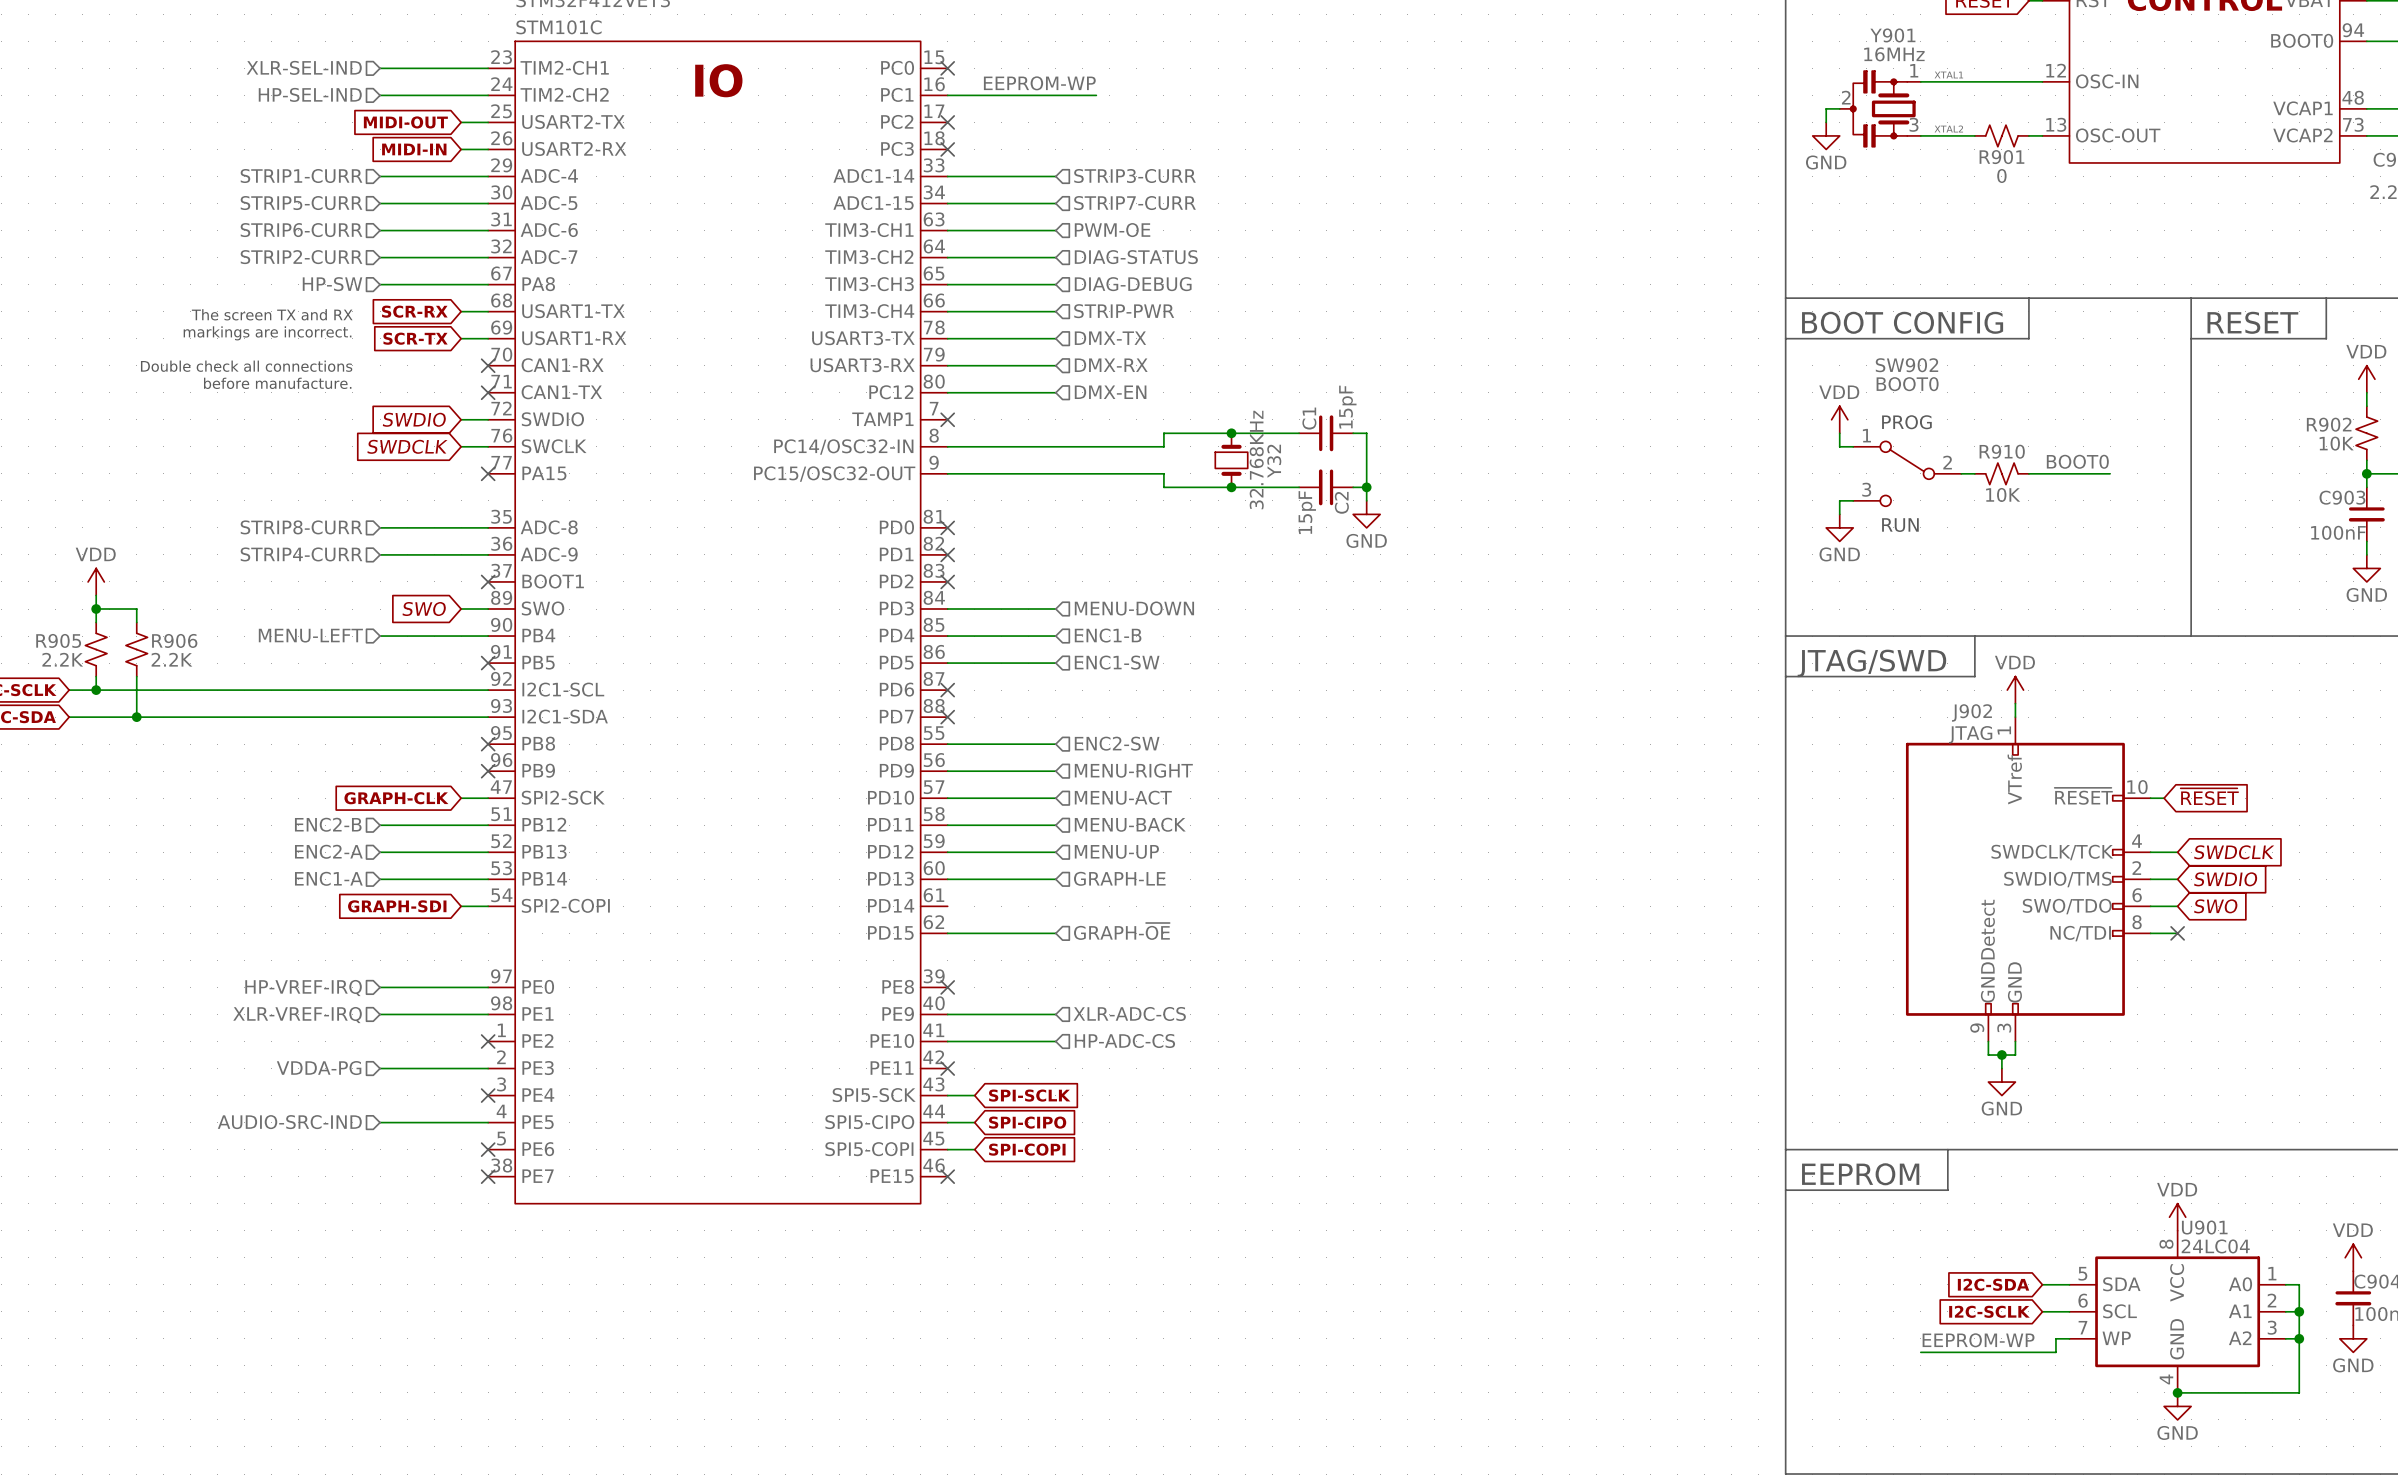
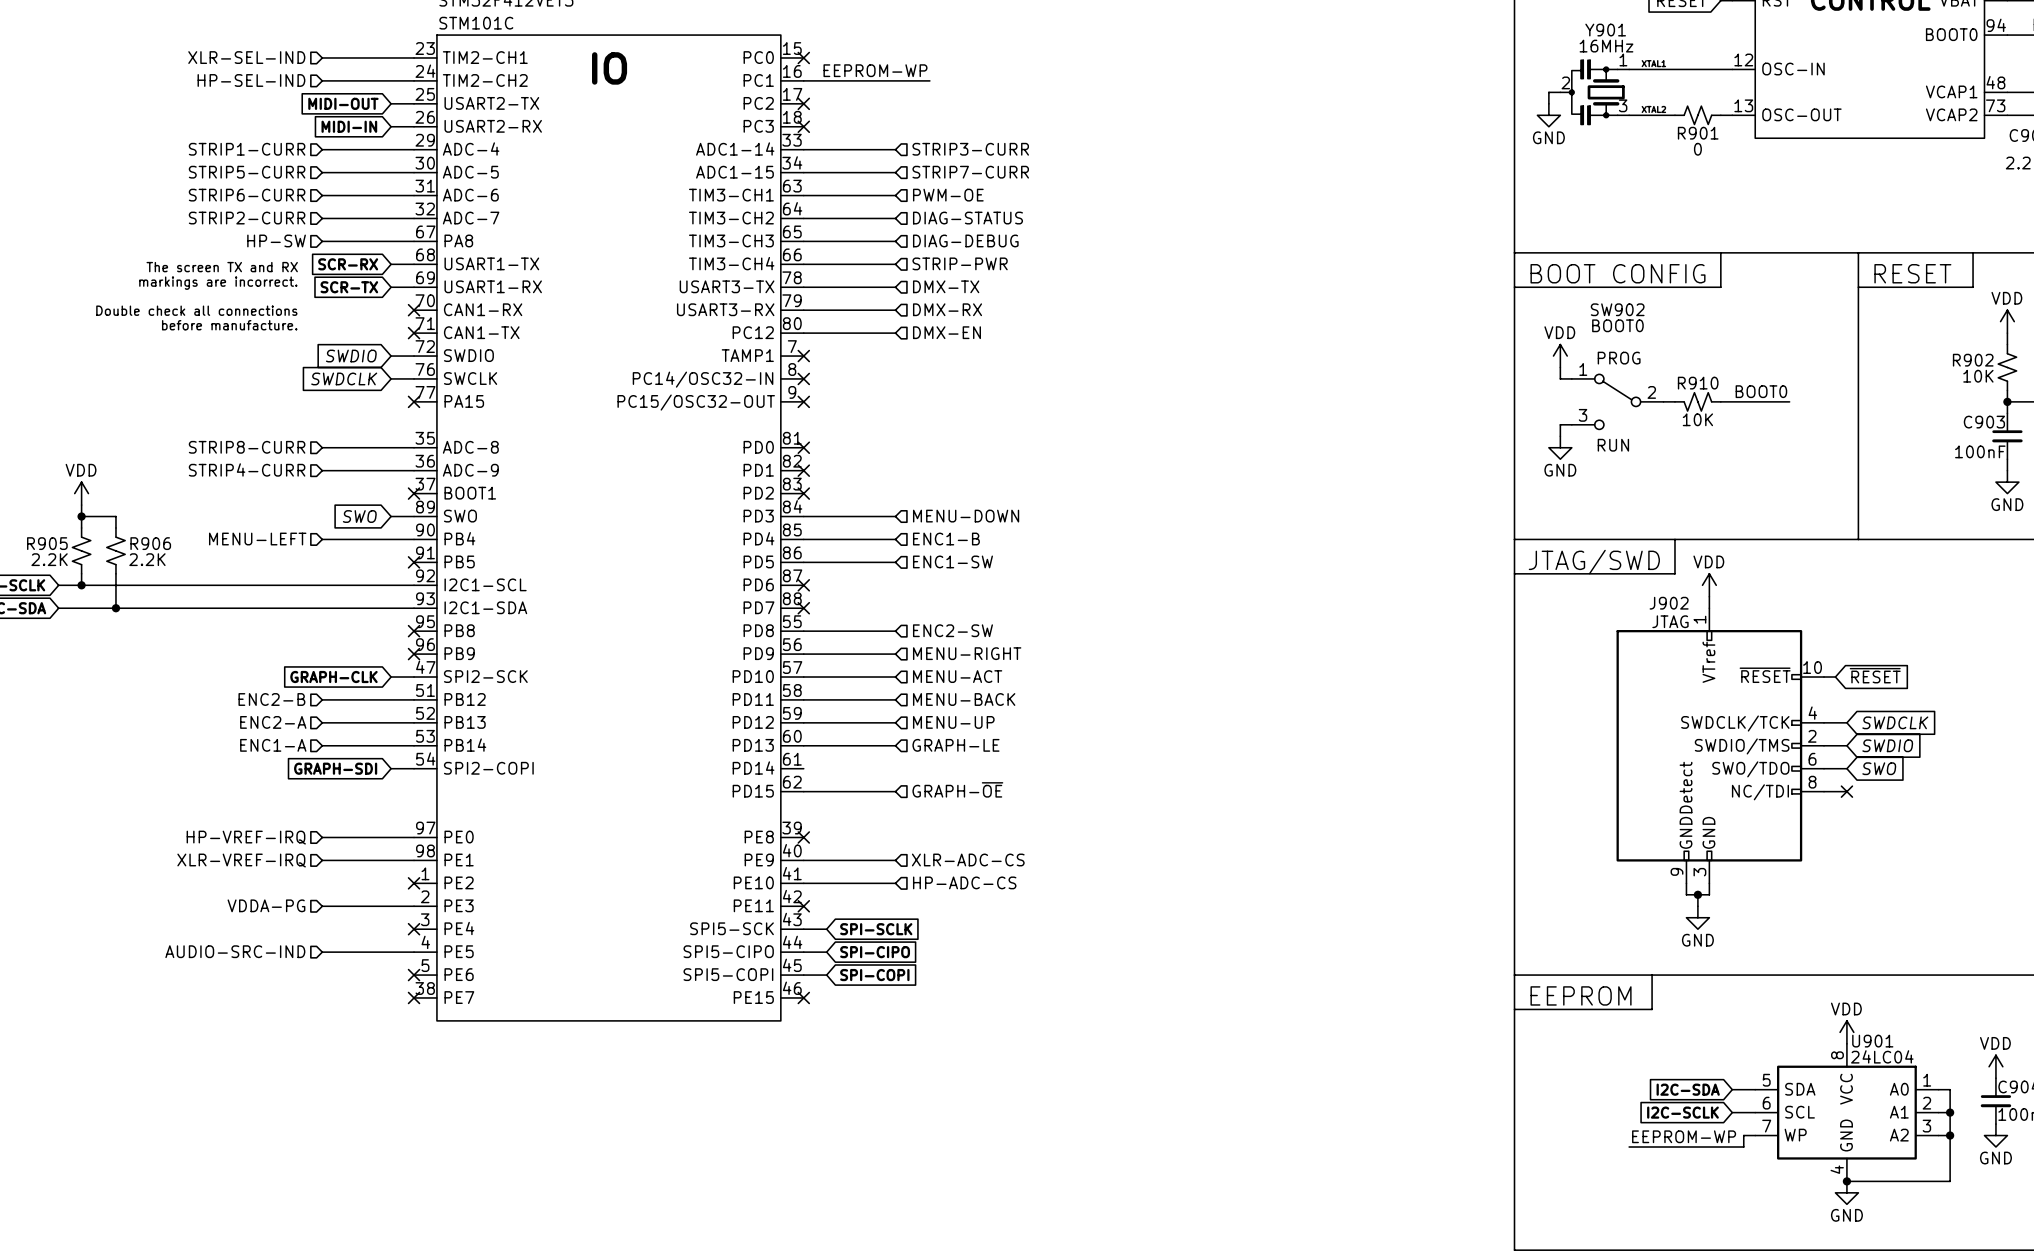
junction: (1231, 433) -> none
wire: (1299, 433) (1163, 433) (1163, 446) (947, 446) -> none
C1: 15pF (1326, 433) -> none
wire: (1353, 433) (1366, 433) (1366, 500) -> none
no-connect mark: none -> (803, 378)
Y32: 32.768KHz (1231, 460) -> none
wire: (947, 473) (1163, 473) (1163, 487) (1299, 487) -> none
no-connect mark: none -> (803, 401)
junction: (1231, 487) -> none
C2: 15pF (1326, 487) -> none
wire: (1353, 487) (1366, 487) -> none
junction: (1366, 487) -> none
power symbol: GND (1366, 514) -> none

